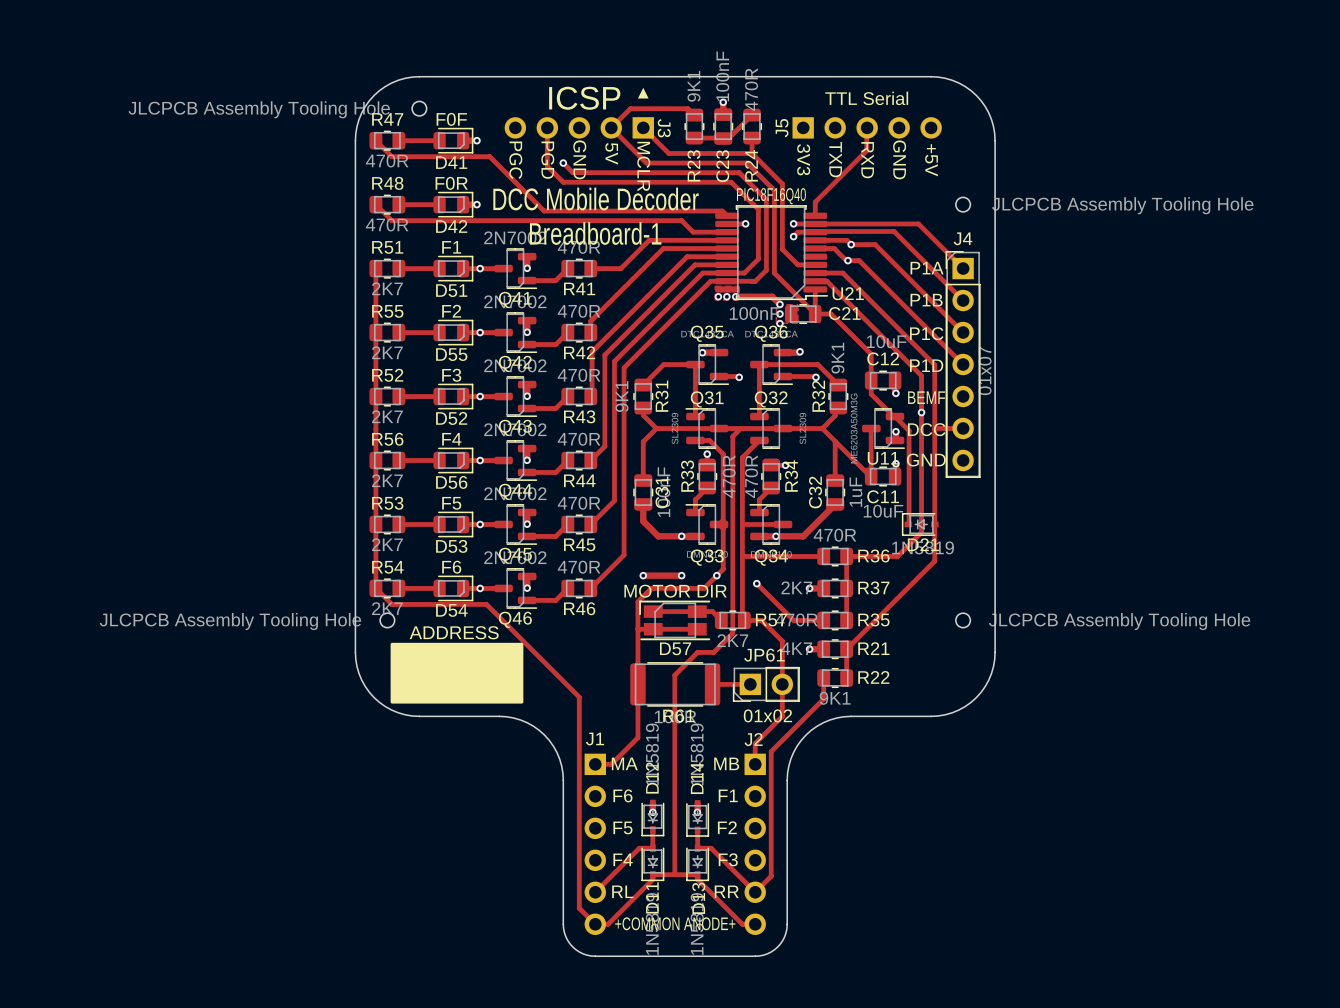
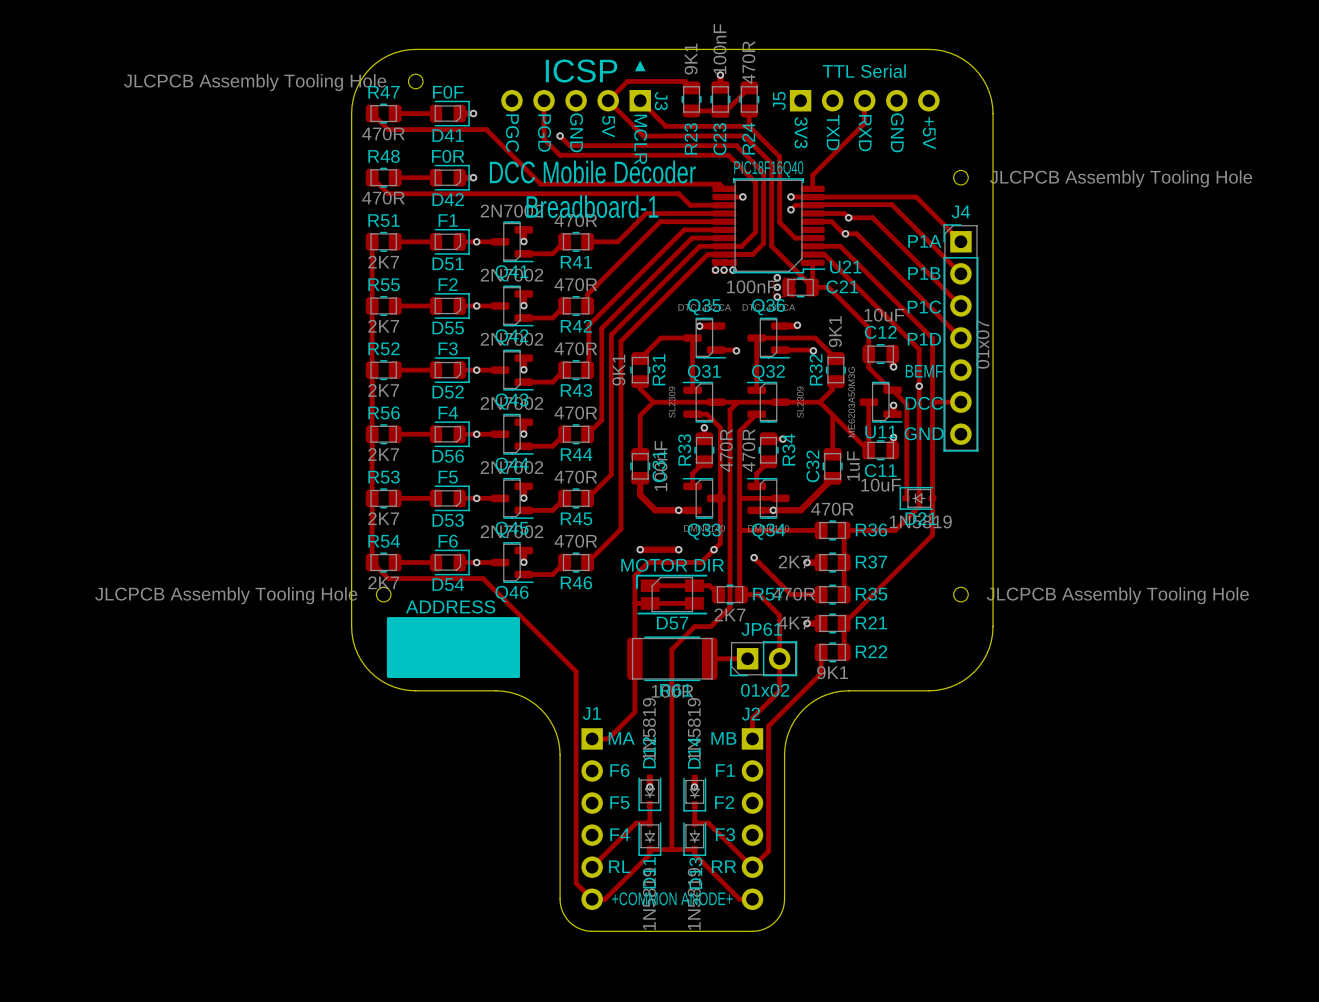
track: (735, 296) (772, 296) (779, 304) -> none

